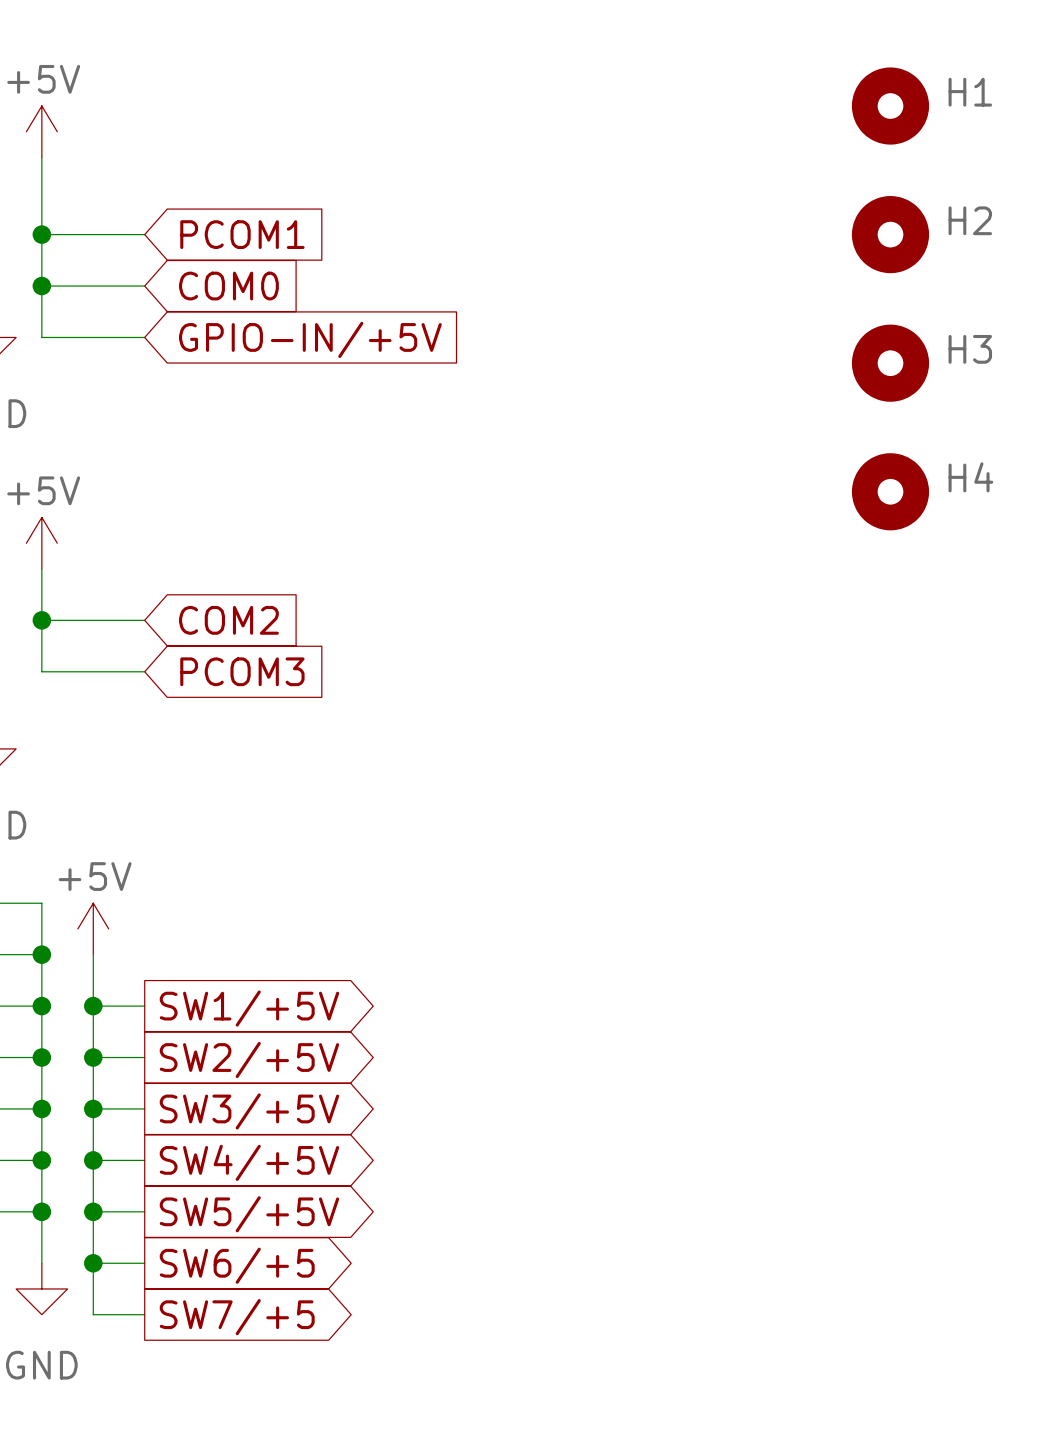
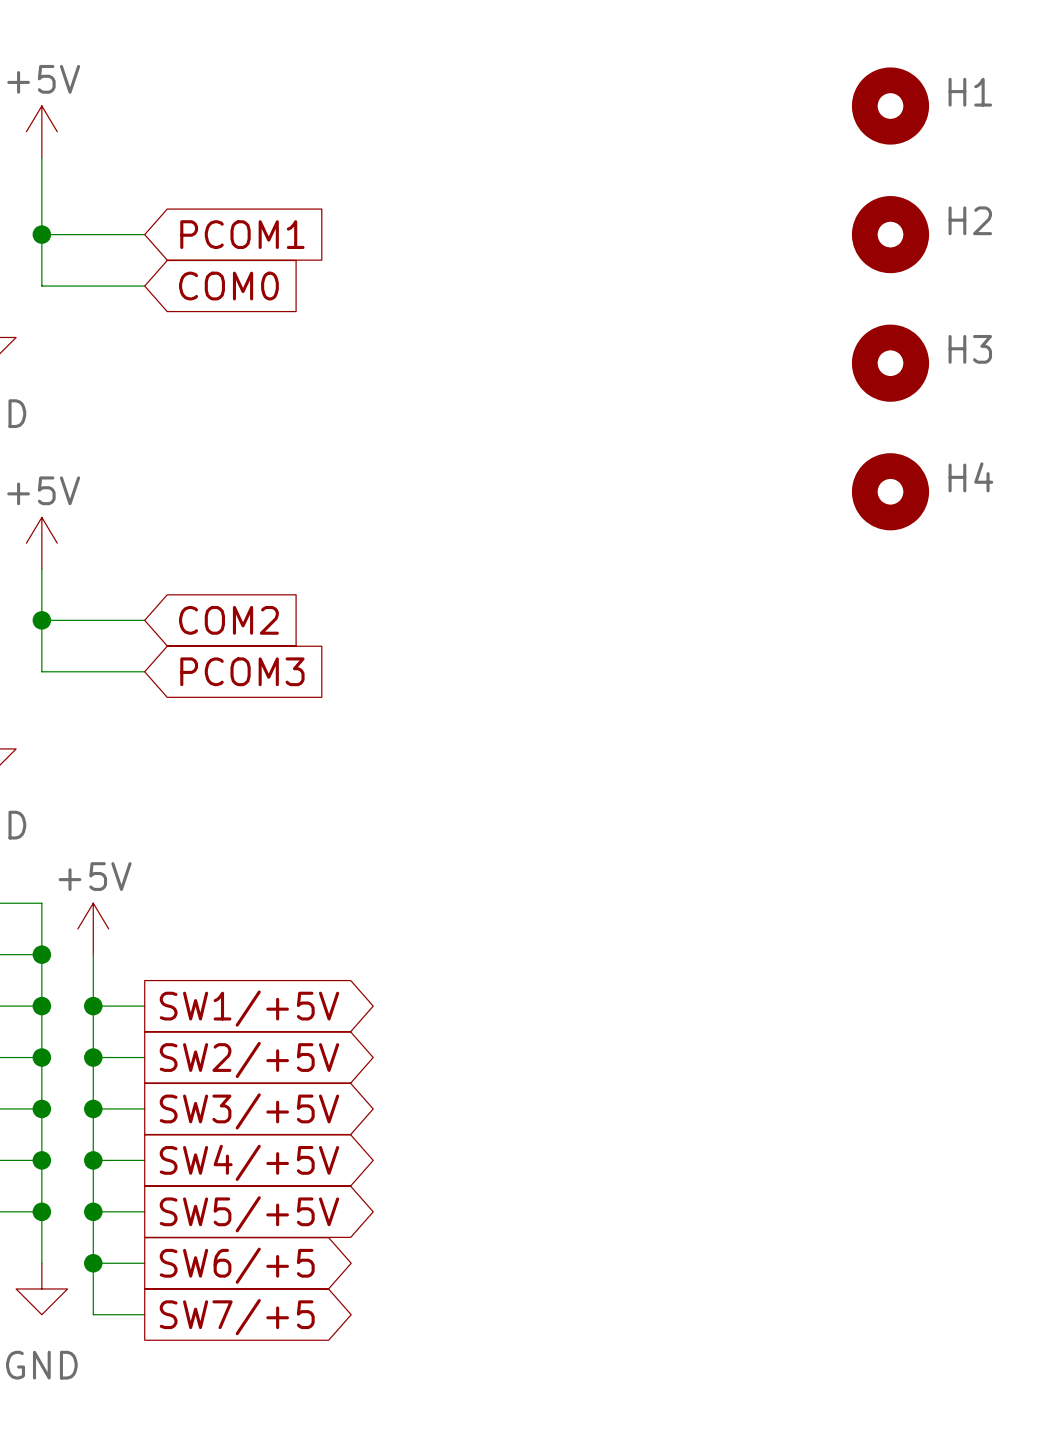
wire: (41, 286) (41, 337) (144, 337) -> none
junction: (41, 286) -> none
global label: GPIO-IN/+5V (310, 339) -> none

